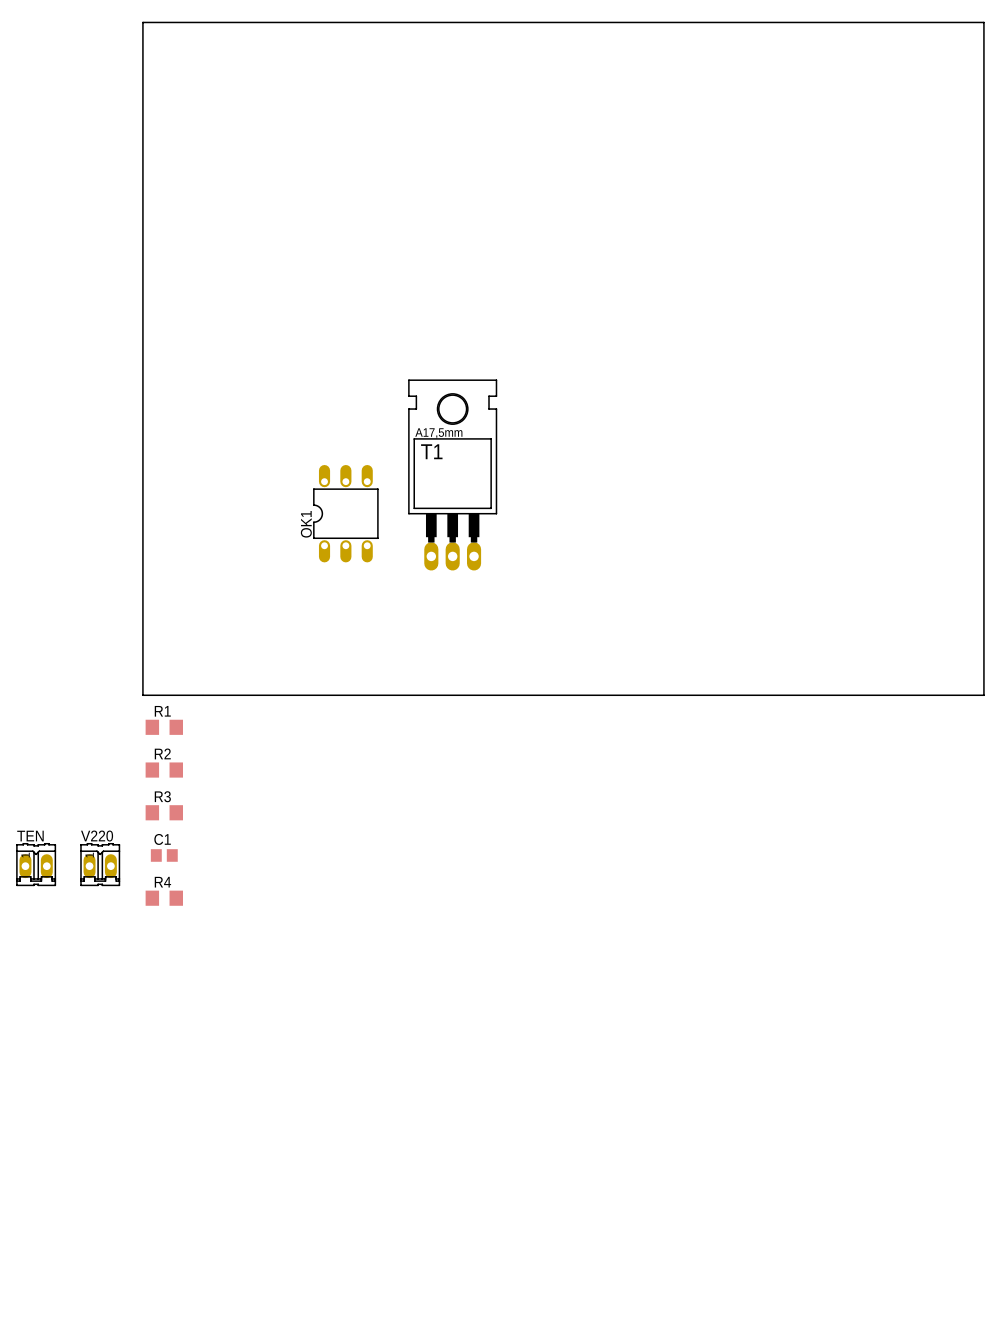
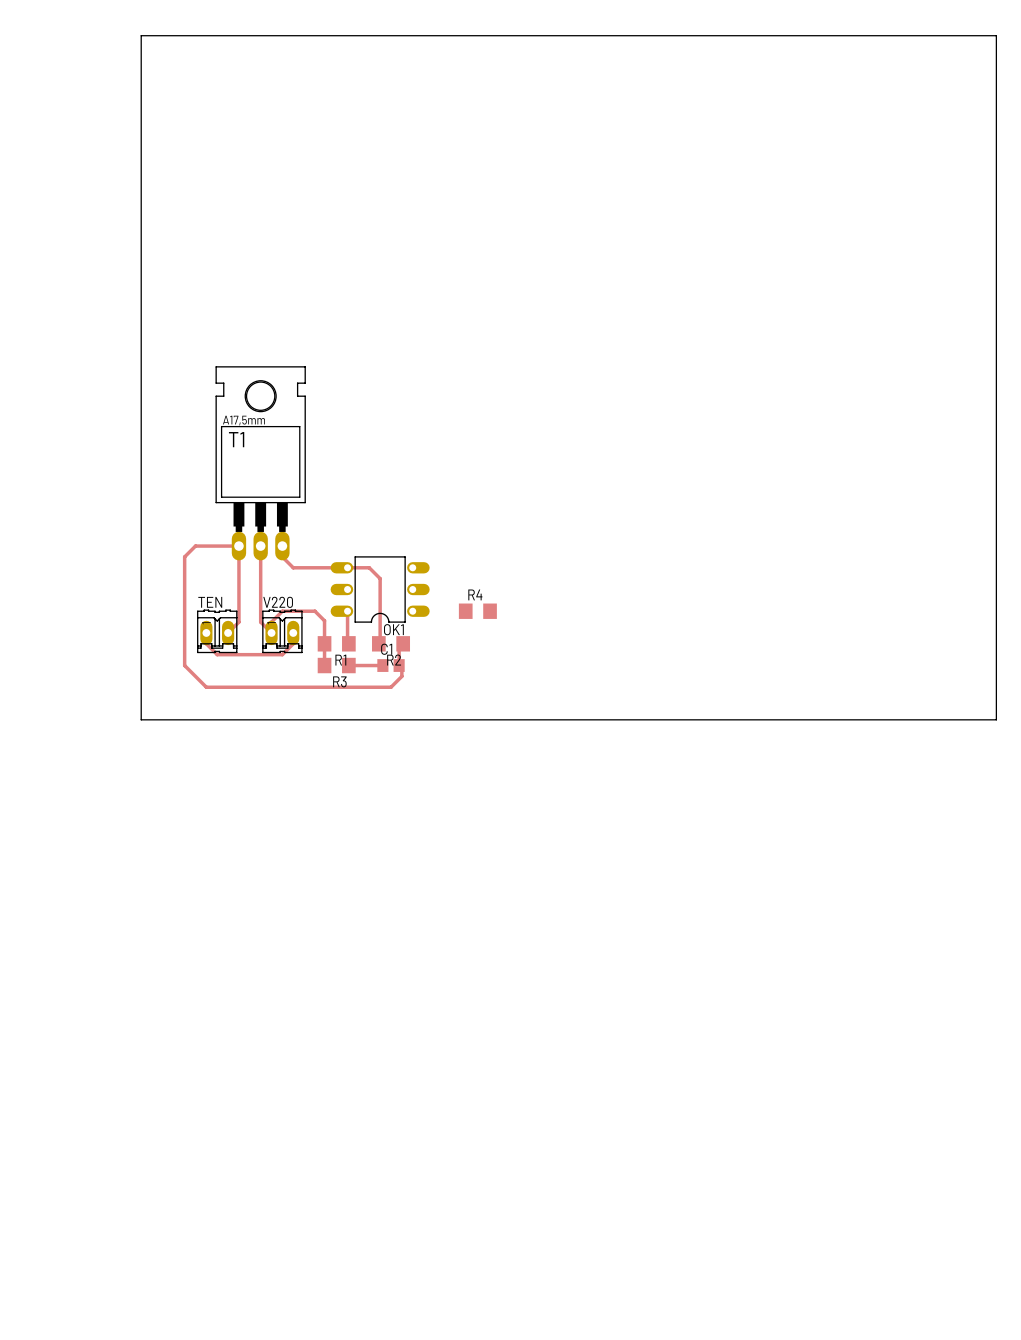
T1 position: (452, 475) -> (260, 463)
OK1 rotation: 0° (345, 513) -> 90° counterclockwise (380, 589)
OK1 position: (345, 513) -> (380, 589)
top track: none -> (260, 546) (260, 622) (271, 632) (271, 622) (282, 611) (314, 611) (324, 620) (324, 665)
top track: none -> (282, 546) (282, 556) (293, 567) (369, 567) (380, 578) (378, 643)
top track: none -> (347, 611) (348, 643)
TEN: none -> (217, 631)
top track: none -> (206, 632) (206, 643) (217, 654) (282, 654) (293, 643) (293, 632)
top track: none -> (228, 632) (238, 622) (238, 546) (195, 546) (184, 556) (184, 665) (206, 687) (391, 687) (401, 676) (401, 668) (399, 665) (399, 647) (403, 643)
top track: none -> (348, 665) (382, 665)
R1 name position: R1 (162, 711) -> R1 (340, 660)
R1 position: (164, 727) -> (336, 643)
R2 name position: R2 (162, 753) -> R2 (394, 660)
R2 position: (164, 770) -> (391, 643)
R3 name position: R3 (162, 796) -> R3 (339, 681)
R3 position: (164, 812) -> (336, 665)
C1 position: (164, 855) -> (391, 665)
TEN: (36, 864) -> none
V220 position: (100, 864) -> (282, 631)
R4 position: (164, 898) -> (477, 611)

